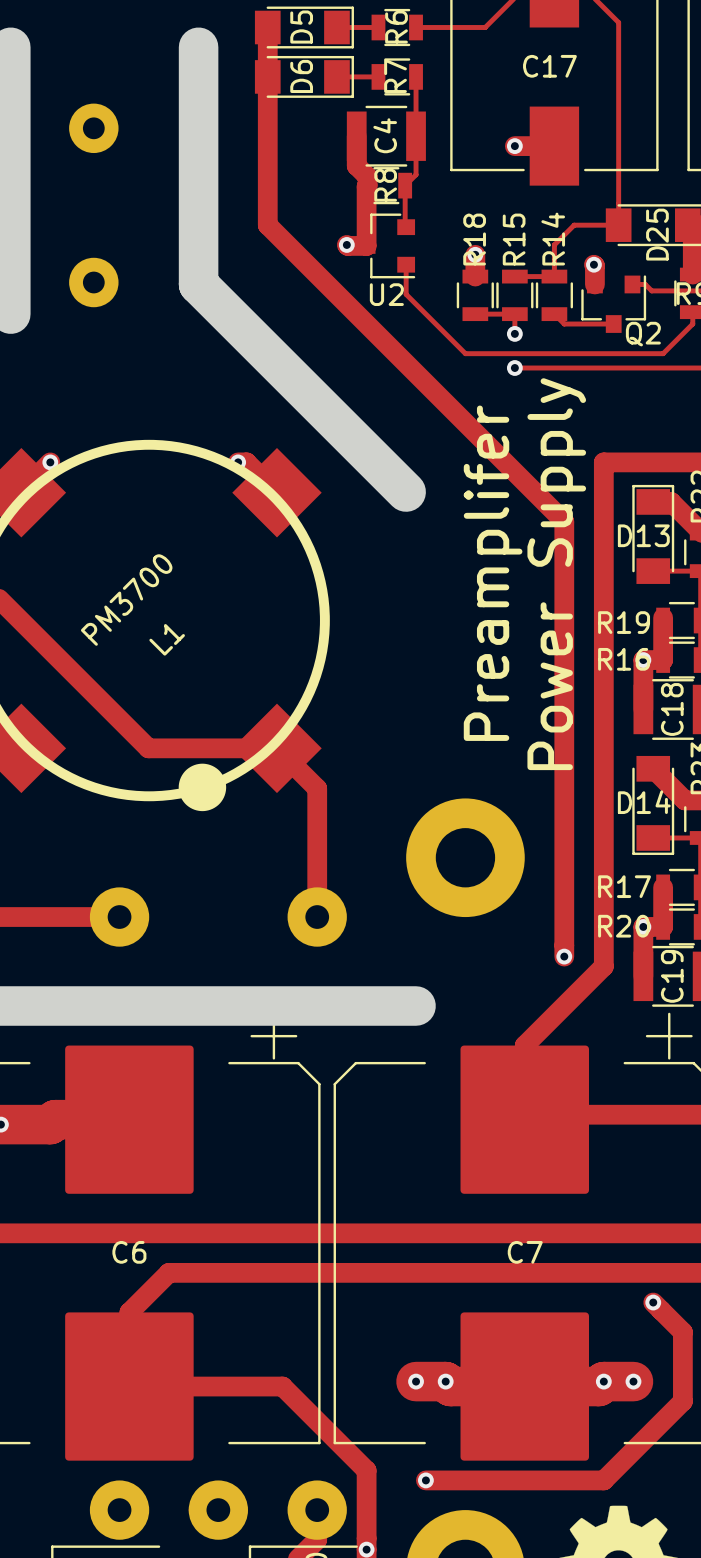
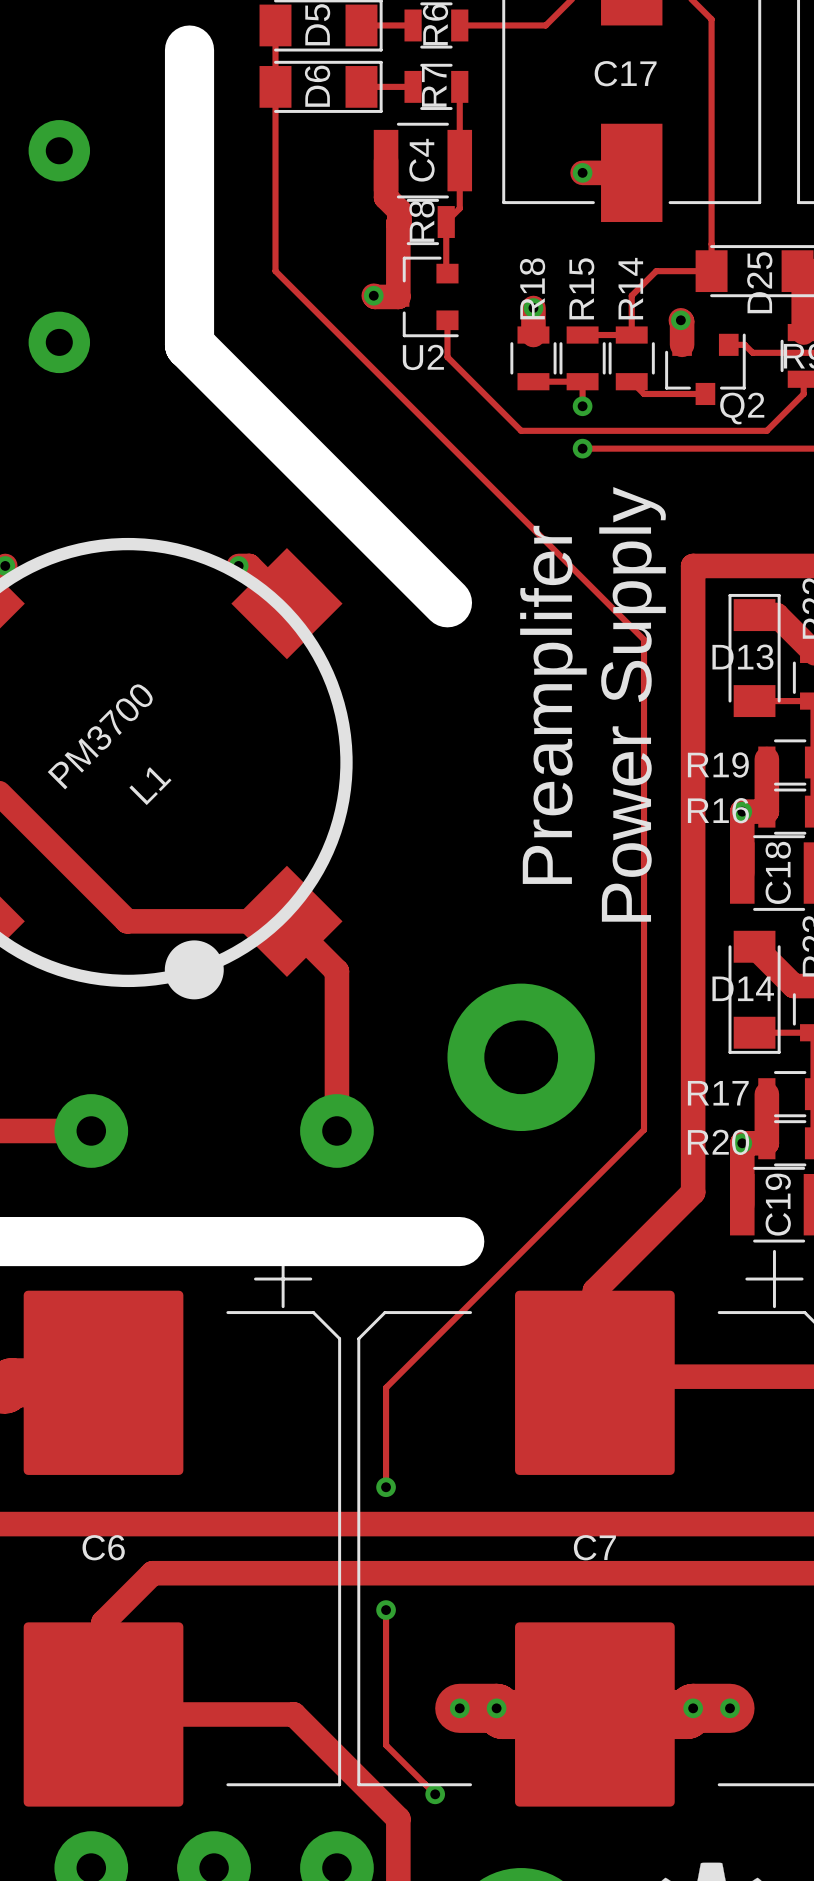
track width: thick (267, 27) (267, 225) (564, 521) (564, 916) -> thin (275, 25) (275, 271) (644, 639) (644, 1129)
track: (564, 916) (564, 956) -> (644, 1129) (386, 1387) (386, 1487)
via: (564, 956) -> none
via: none -> (386, 1487)
track: none -> (386, 1610) (386, 1745) (435, 1794)
via: none -> (386, 1610)
track: (653, 1302) (682, 1332) (682, 1401) (603, 1480) (425, 1480) -> none
via: (653, 1302) -> none
via position: (425, 1480) -> (435, 1794)

